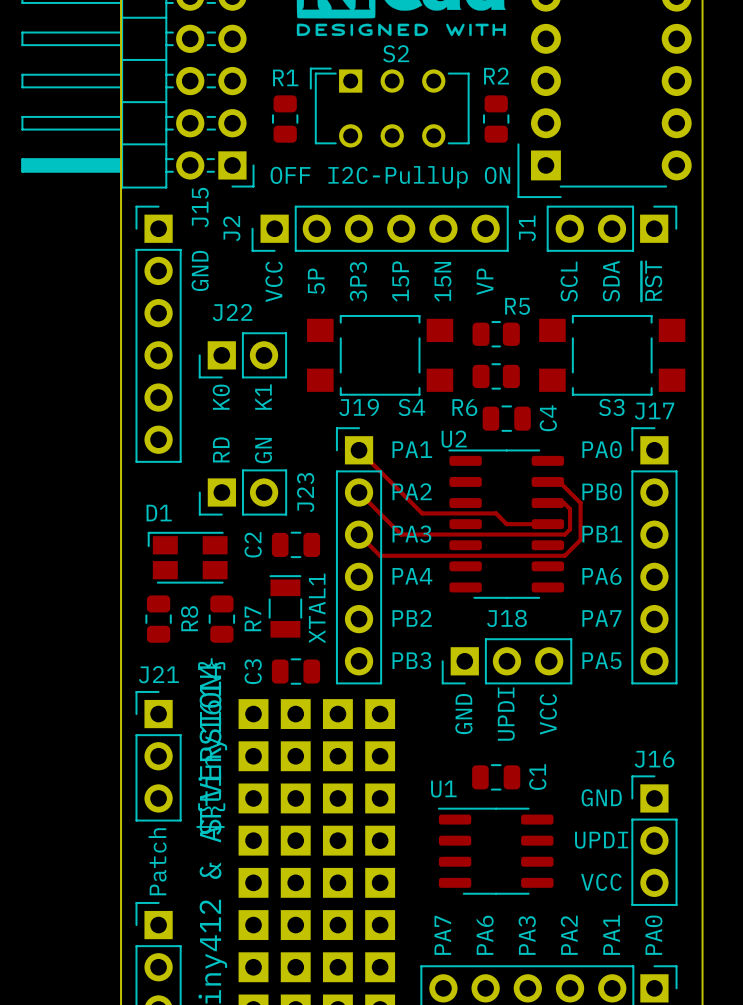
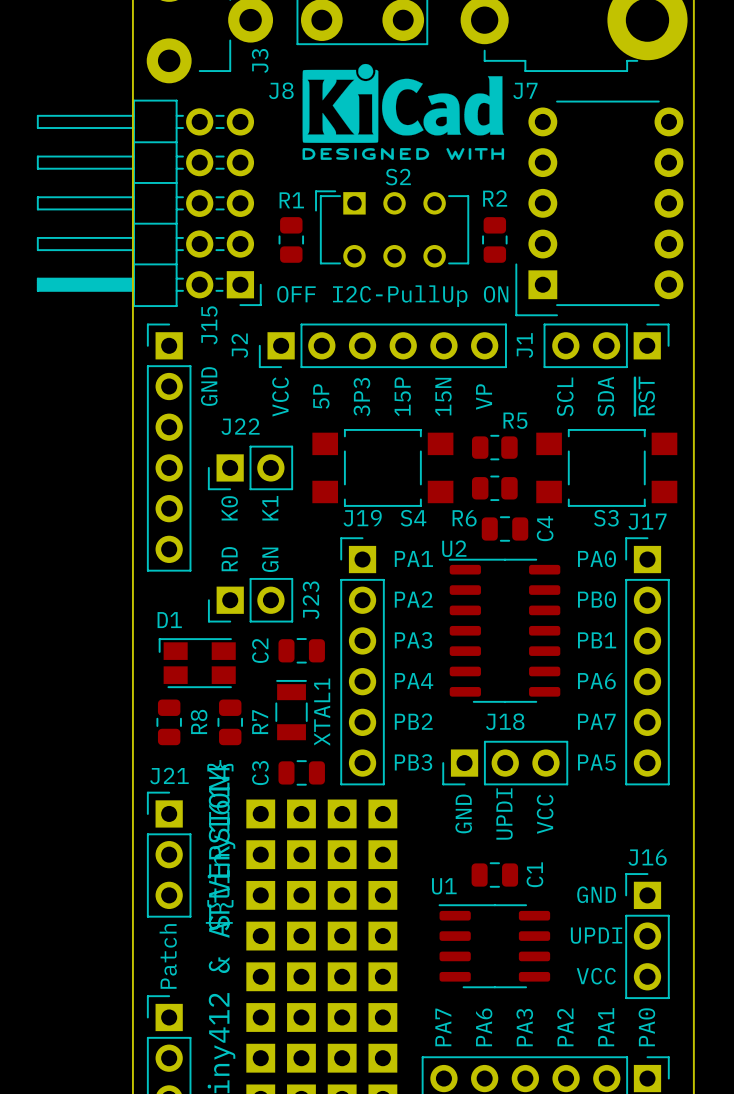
track: (359, 450) (422, 513) (496, 513) (506, 524) (547, 524) -> none
track: (547, 481) (559, 481) (580, 503) (580, 539) (564, 555) (380, 555) (359, 534) -> none
track: (359, 492) (401, 534) (564, 534) (570, 529) (570, 509) (564, 503) (547, 503) -> none

